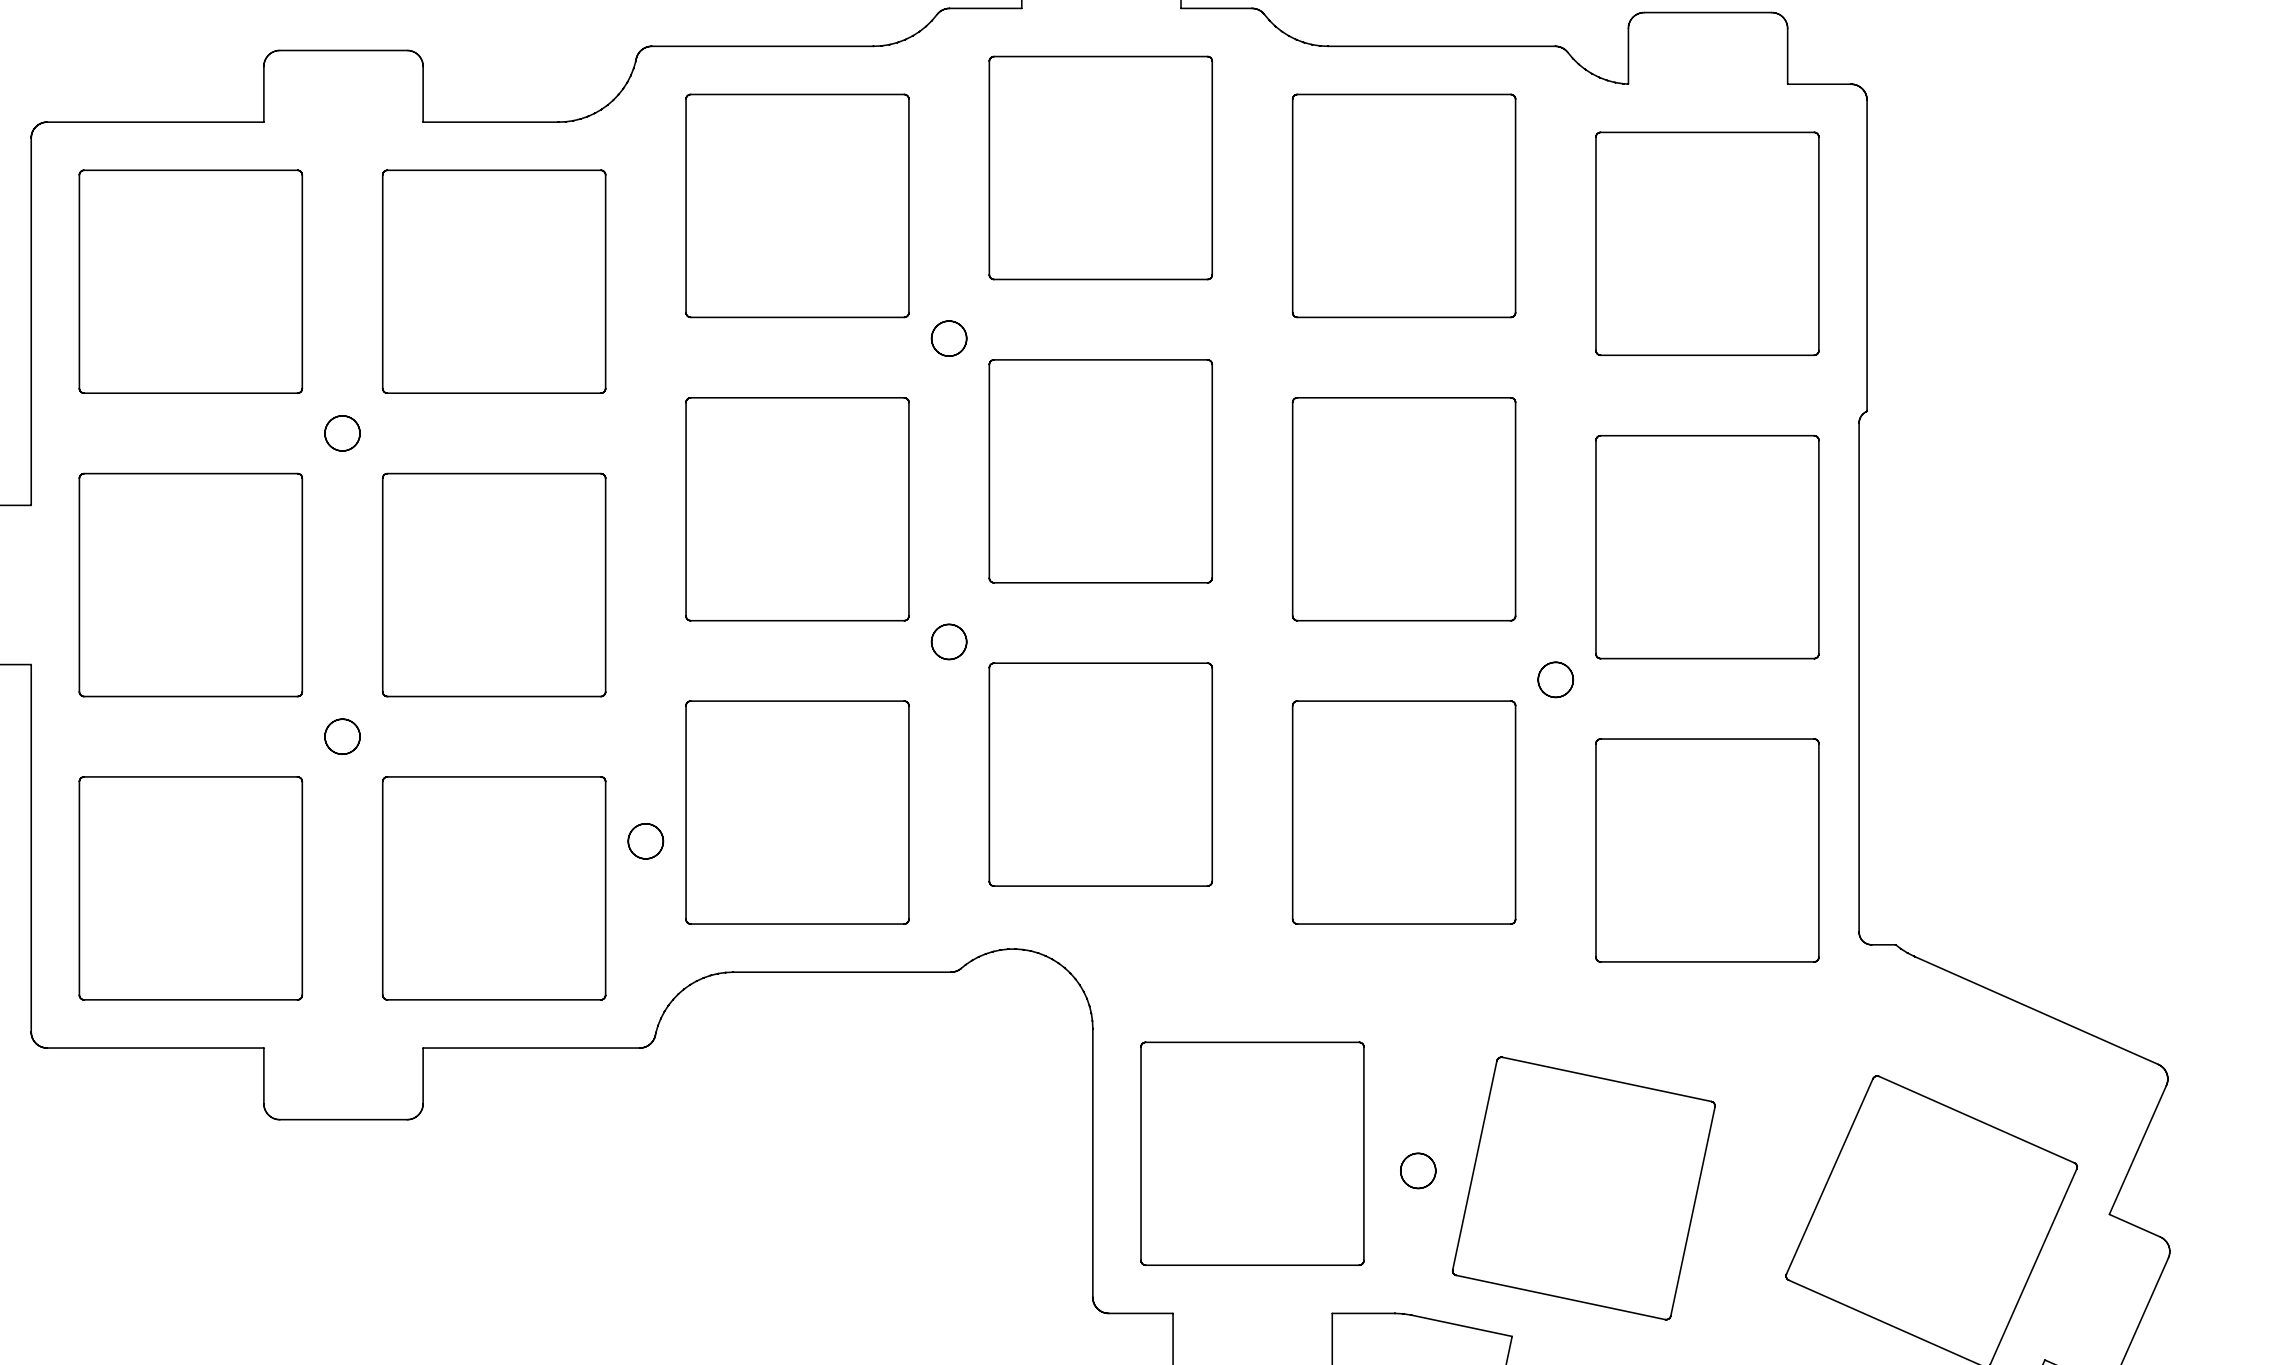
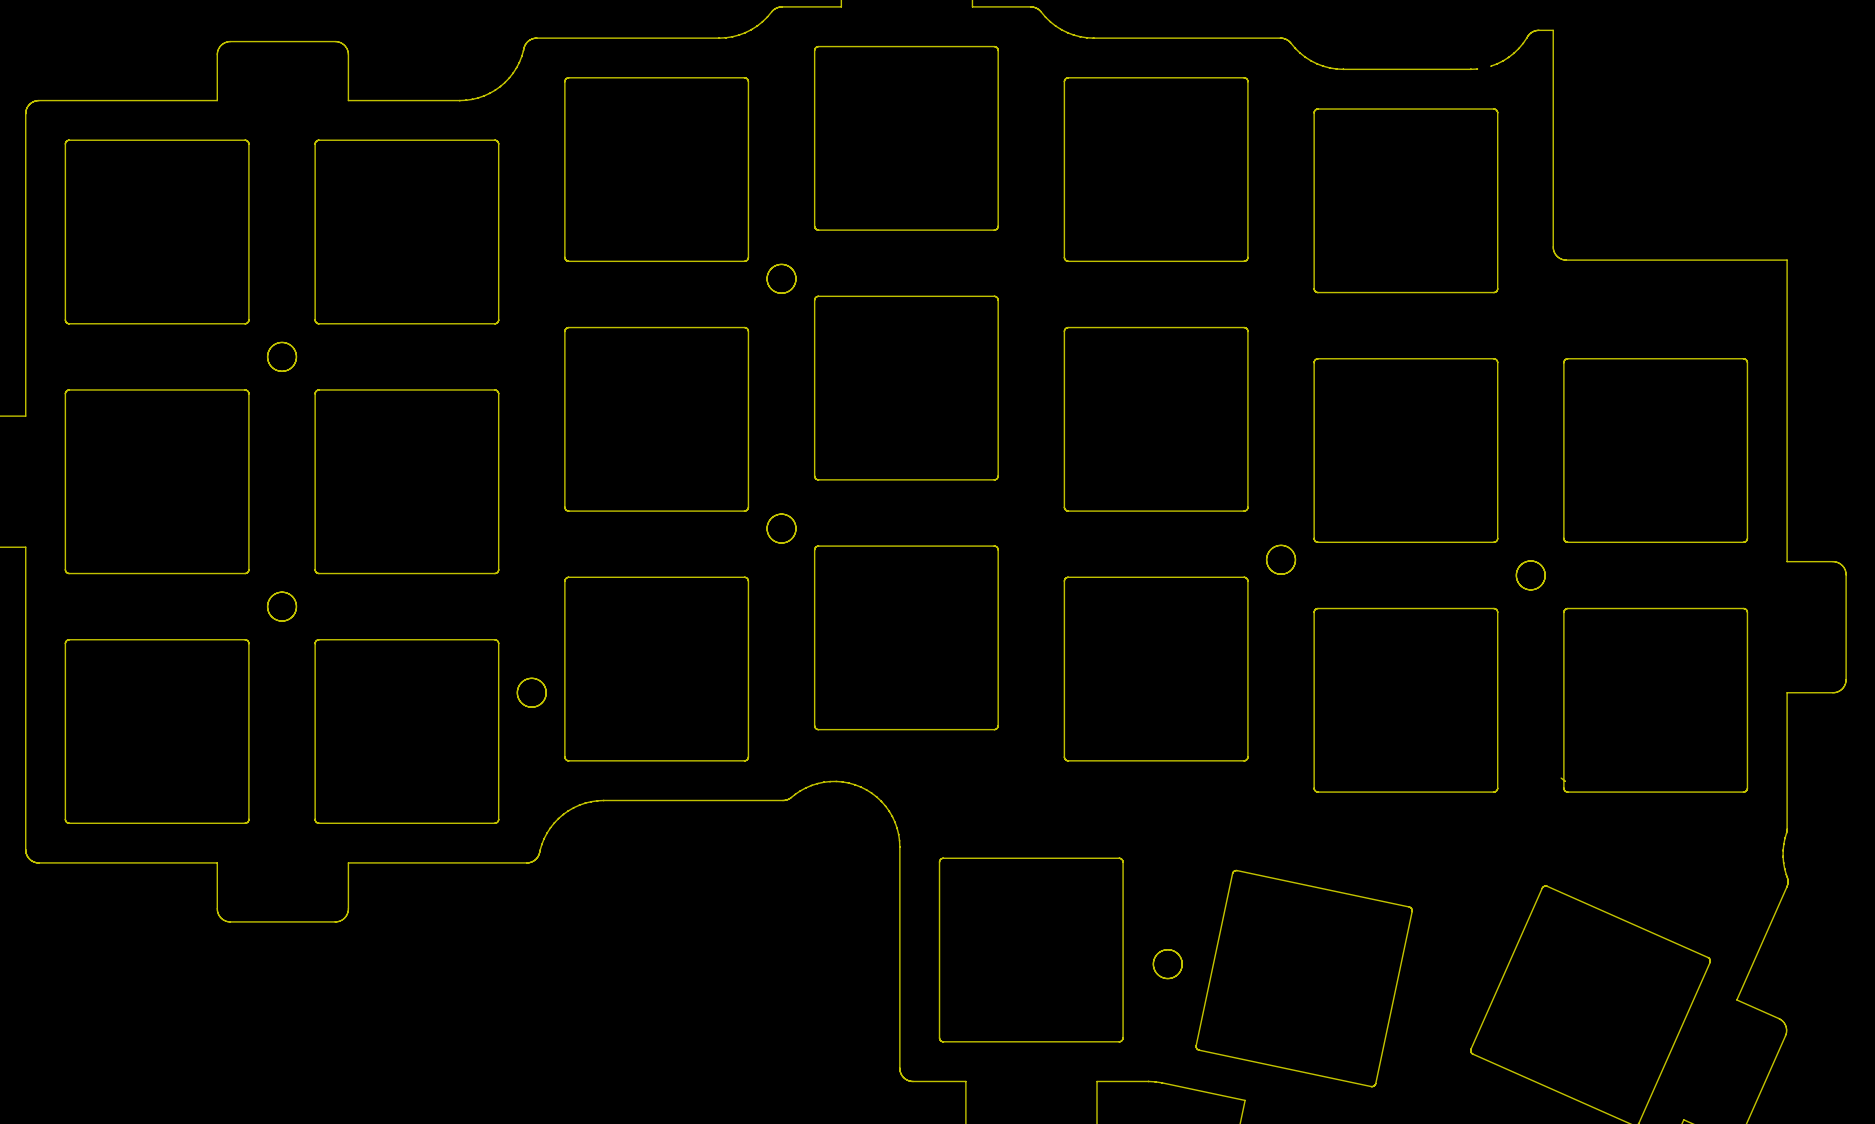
board edge: none -> (1538, 30) (1531, 32) (1527, 37)
board edge: none -> (1538, 30) (1553, 30) (1553, 247) (1557, 256) (1566, 260) (1787, 260) (1787, 561) (1835, 561) (1843, 566) (1846, 574) (1844, 685) (1840, 690) (1834, 692) (1787, 692) (1787, 829)
board edge: none -> (1526, 37) (1523, 43)
board edge: none -> (1523, 43) (1518, 48)
board edge: none -> (1518, 48) (1514, 53)
board edge: none -> (1514, 53) (1508, 57)
board edge: none -> (1508, 57) (1503, 60)
board edge: none -> (1503, 60) (1497, 63)
board edge: none -> (1497, 63) (1490, 66)
board edge: (1628, 84) (1628, 26) (1631, 19) (1636, 14) (1644, 12) (1771, 12) (1781, 16) (1787, 25) (1787, 84) (1850, 84) -> (1340, 69) (1477, 69)
board edge: (1851, 84) (1862, 88) (1867, 99) -> none
board edge: (1867, 100) (1867, 411) -> none
board edge: (1867, 411) (1861, 416) (1859, 423) (1859, 933) (1861, 940) (1868, 944) (1895, 944) -> none
board edge: none -> (1567, 358) (1746, 359) (1746, 541) (1565, 541) (1563, 362) (1567, 358)
board edge: none -> (1530, 561) (1520, 565) (1516, 576) (1521, 586) (1531, 589) (1541, 585) (1545, 574) (1540, 564) (1530, 561)
board edge: none -> (1567, 608) (1563, 612) (1565, 790) (1746, 790) (1746, 609) (1567, 608)
board edge: (1901, 949) (1907, 953) -> none
board edge: (1907, 953) (1914, 956) -> none
board edge: (1914, 956) (2158, 1064) -> none
board edge: none -> (1787, 829) (1786, 833)
board edge: none -> (1786, 833) (1785, 838)
board edge: none -> (1785, 838) (1783, 844)
board edge: none -> (1783, 844) (1783, 850)
board edge: none -> (1783, 850) (1783, 856)
board edge: none -> (1783, 856) (1783, 862)
board edge: none -> (1783, 862) (1784, 868)
board edge: none -> (1784, 869) (1786, 874)
board edge: none -> (1786, 875) (1787, 876)
board edge: (2158, 1064) (2166, 1073) (2166, 1085) -> (1786, 887) (1783, 893)
board edge: none -> (1787, 877) (1786, 886)

